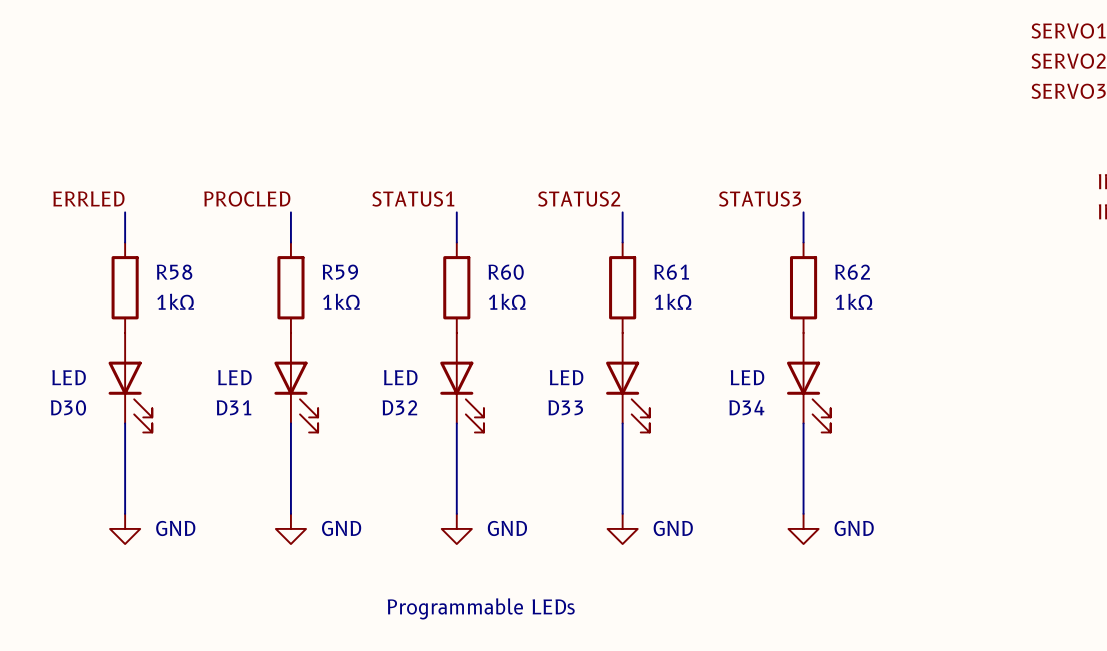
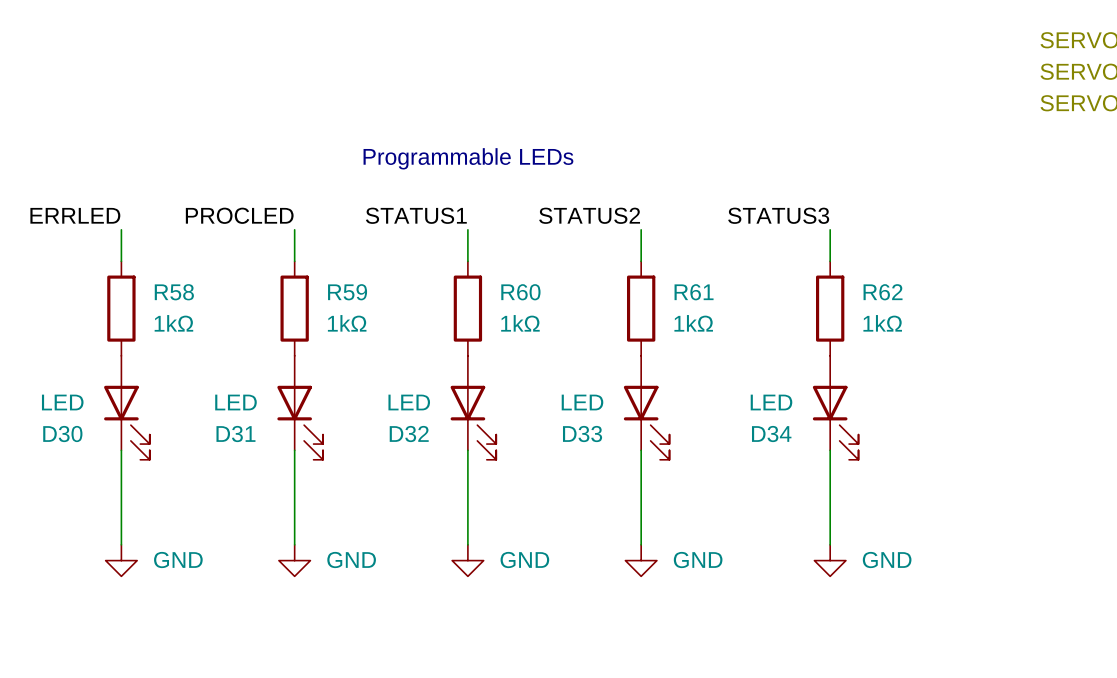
text: none -> Programmable LEDs (468, 158)
text: Programmable LEDs (481, 608) -> none

